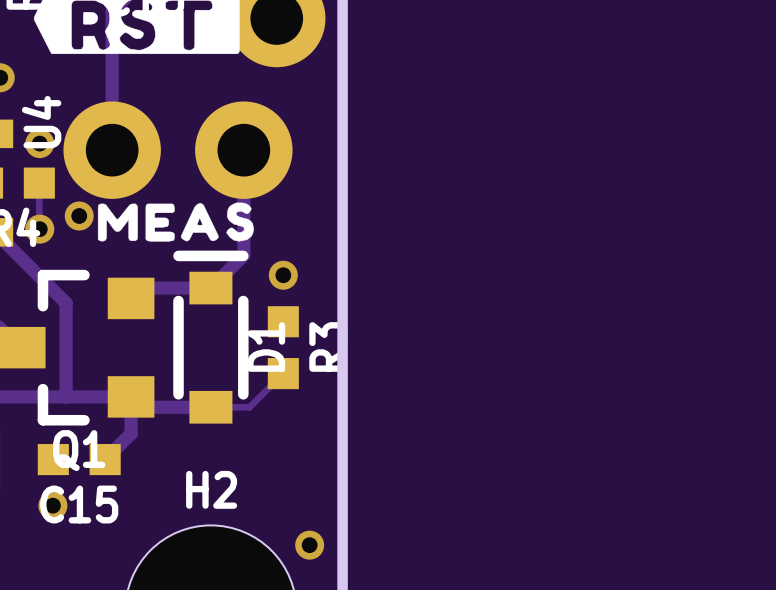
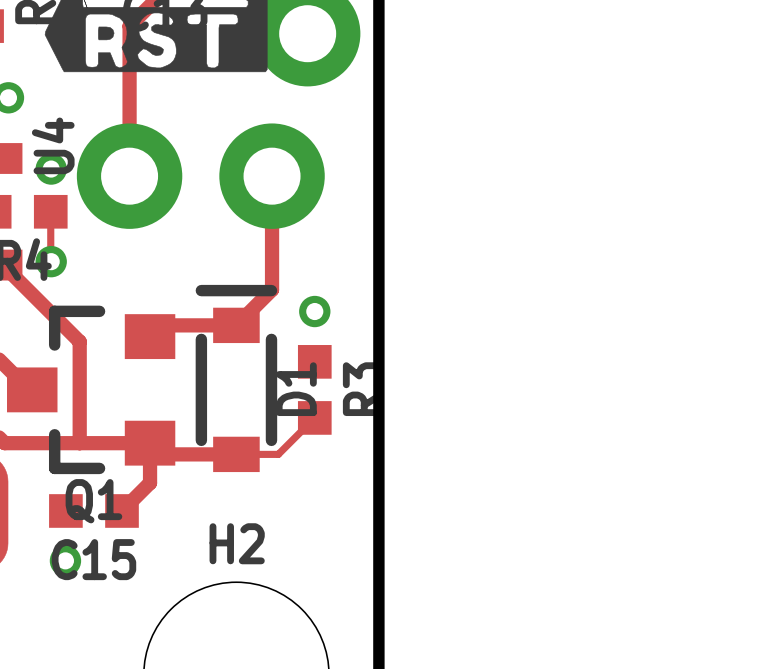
drawing: [97, 202, 254, 242] -> none
via: (79, 216) -> none
via: (309, 545) -> none

